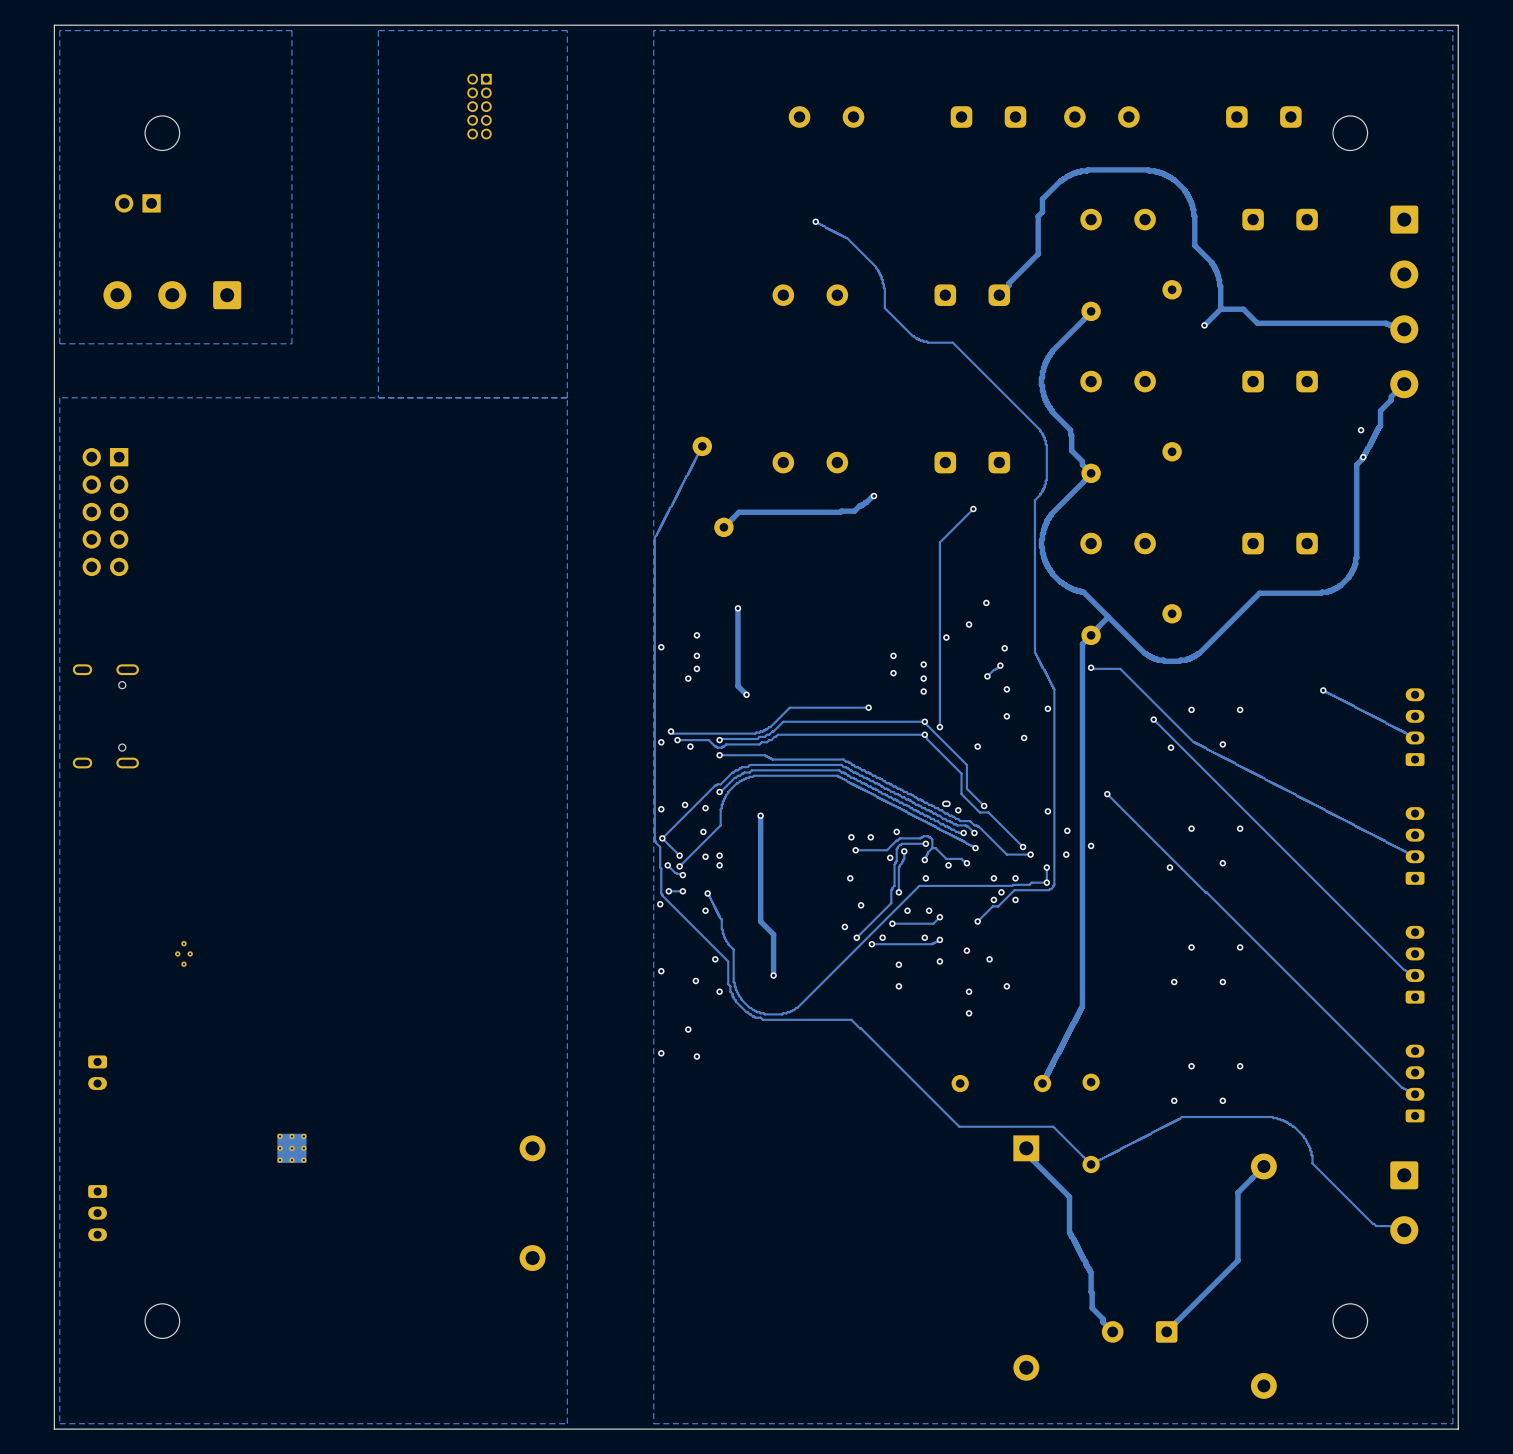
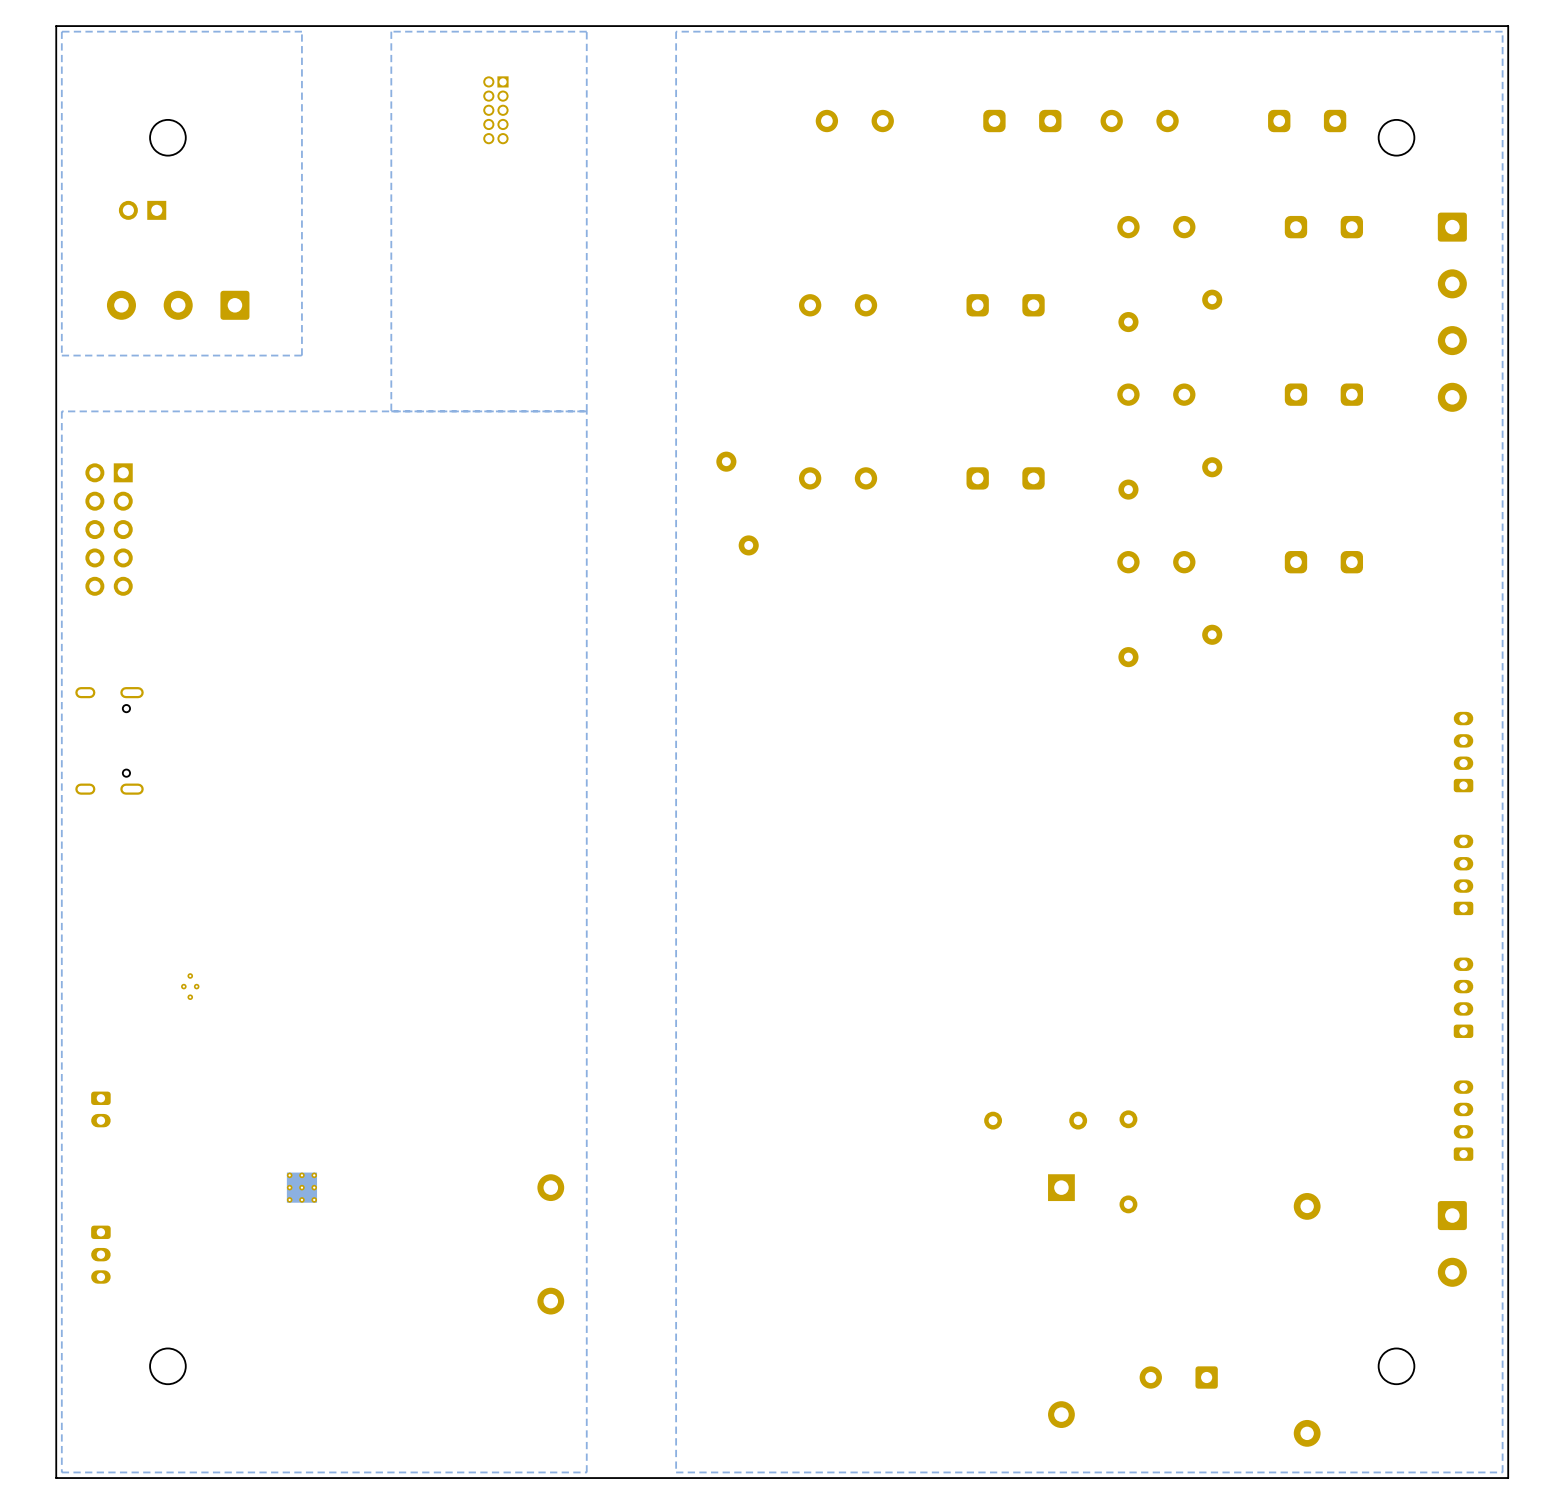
track: (815, 221) (847, 237) (876, 267) (884, 288) (884, 308) (912, 336) (928, 342) (952, 342) (1040, 430) (1046, 445) (1046, 479) (1042, 491) (1034, 500) (1034, 652) (1054, 689) (1054, 884) (1048, 890) (1014, 890) (998, 906) (992, 906) (977, 921) -> none
via: (815, 221) -> none
track: (999, 295) (1038, 254) (1038, 216) (1042, 212) (1042, 199) (1060, 180) (1073, 173) (1087, 169) (1148, 169) (1171, 177) (1187, 193) (1194, 216) (1194, 245) (1212, 262) (1218, 275) (1220, 309) -> none
track: (1220, 309) (1204, 325) -> none
track: (1220, 309) (1243, 309) (1257, 323) (1385, 323) (1404, 329) -> none
track: (1091, 311) (1052, 351) (1042, 371) (1041, 384) (1044, 398) (1052, 411) (1070, 430) (1071, 450) (1091, 473) (1046, 520) (1041, 540) (1042, 553) (1047, 567) (1060, 582) (1073, 590) (1083, 592) (1145, 653) (1158, 660) (1179, 661) (1195, 655) (1259, 593) (1327, 592) (1340, 585) (1349, 577) (1354, 567) (1356, 557) (1356, 464) (1364, 456) (1380, 425) (1380, 410) (1404, 384) -> none
via: (1204, 325) -> none
via: (1361, 430) -> none
track: (702, 446) (654, 537) (654, 840) (660, 847) (662, 895) (728, 961) (728, 984) (735, 1001) (746, 1012) (762, 1019) (851, 1019) (959, 1126) (1053, 1126) (1091, 1164) (1181, 1117) (1272, 1117) (1283, 1120) (1294, 1126) (1303, 1136) (1311, 1151) (1312, 1163) (1372, 1223) (1404, 1230) -> none
via: (1363, 457) -> none
track: (874, 496) (854, 511) (739, 512) (723, 527) -> none
via: (874, 496) -> none
track: (973, 509) (939, 542) (939, 727) -> none
via: (973, 509) -> none
via: (986, 602) -> none
track: (737, 608) (737, 686) (746, 694) -> none
via: (737, 608) -> none
track: (1108, 617) (1082, 644) (1082, 1006) (1042, 1083) -> none
via: (969, 624) -> none
via: (696, 635) -> none
via: (946, 637) -> none
via: (661, 647) -> none
via: (1004, 648) -> none
via: (696, 655) -> none
via: (893, 655) -> none
via: (923, 664) -> none
track: (1000, 665) (987, 676) -> none
via: (1000, 665) -> none
track: (1091, 667) (1120, 668) (1193, 742) (1415, 856) -> none
via: (1091, 667) -> none
via: (696, 668) -> none
via: (893, 673) -> none
via: (987, 676) -> none
via: (688, 678) -> none
via: (923, 678) -> none
via: (1006, 689) -> none
track: (1323, 690) (1415, 737) -> none
via: (1323, 690) -> none
via: (923, 691) -> none
via: (746, 694) -> none
track: (868, 707) (789, 707) (770, 727) (755, 733) (673, 733) (671, 731) -> none
via: (868, 707) -> none
via: (1047, 708) -> none
via: (1191, 709) -> none
via: (1240, 709) -> none
via: (1006, 716) -> none
track: (1153, 719) (1404, 970) (1415, 975) -> none
via: (1153, 719) -> none
via: (924, 721) -> none
via: (939, 727) -> none
via: (671, 731) -> none
via: (924, 734) -> none
via: (1024, 737) -> none
track: (677, 740) (708, 740) (715, 746) (721, 747) (726, 744) (759, 744) (771, 740) (777, 734) (924, 734) (961, 773) (961, 794) (979, 812) (988, 812) (1023, 847) -> none
via: (677, 740) -> none
track: (719, 740) (757, 739) (764, 736) (783, 721) (924, 721) (966, 764) (966, 788) (984, 805) -> none
via: (719, 740) -> none
via: (661, 742) -> none
via: (1222, 744) -> none
via: (690, 746) -> none
via: (977, 746) -> none
via: (1171, 747) -> none
track: (719, 755) (764, 755) (772, 759) (843, 759) (960, 821) (970, 821) (978, 826) (1006, 854) (1030, 854) -> none
via: (719, 755) -> none
track: (719, 791) (737, 775) (752, 770) (839, 770) (940, 824) (956, 831) (963, 832) -> none
via: (719, 791) -> none
track: (1107, 794) (1402, 1087) (1415, 1094) -> none
via: (1107, 794) -> none
via: (945, 803) -> none
via: (947, 803) -> none
via: (685, 804) -> none
via: (984, 805) -> none
via: (705, 808) -> none
via: (661, 809) -> none
via: (958, 810) -> none
via: (1047, 811) -> none
track: (760, 815) (760, 921) (773, 934) (773, 975) -> none
via: (760, 815) -> none
via: (1191, 828) -> none
via: (1240, 828) -> none
via: (1067, 830) -> none
via: (703, 831) -> none
via: (896, 831) -> none
via: (963, 832) -> none
track: (974, 832) (967, 826) (953, 824) (841, 764) (749, 764) (735, 770) (720, 784) (715, 785) (662, 838) (679, 855) -> none
via: (974, 832) -> none
via: (851, 837) -> none
via: (870, 837) -> none
via: (662, 838) -> none
track: (925, 843) (902, 843) (897, 847) (891, 903) (856, 937) -> none
via: (925, 843) -> none
via: (1091, 845) -> none
via: (1023, 847) -> none
track: (932, 848) (924, 859) -> none
track: (932, 848) (932, 839) (928, 836) (923, 836) (920, 838) (899, 838) (886, 850) (855, 850) -> none
track: (932, 848) (935, 848) (946, 858) (961, 858) (966, 863) -> none
track: (975, 848) (837, 775) (754, 775) (740, 781) (728, 791) (720, 809) (720, 825) (679, 866) -> none
via: (975, 848) -> none
via: (855, 850) -> none
track: (904, 851) (904, 858) (898, 867) (898, 892) -> none
via: (904, 851) -> none
via: (1030, 854) -> none
via: (1066, 854) -> none
via: (679, 855) -> none
via: (719, 855) -> none
via: (705, 856) -> none
via: (890, 857) -> none
via: (924, 859) -> none
via: (966, 863) -> none
via: (1222, 863) -> none
track: (667, 865) (675, 872) (682, 875) -> none
via: (667, 865) -> none
via: (719, 865) -> none
via: (948, 865) -> none
via: (679, 866) -> none
track: (1046, 867) (1046, 882) (1012, 885) (919, 885) (797, 1007) (782, 1014) (757, 1012) (749, 1007) (739, 996) (733, 982) (733, 949) (723, 936) (721, 919) (707, 893) -> none
via: (1046, 867) -> none
via: (1169, 867) -> none
via: (682, 875) -> none
via: (850, 878) -> none
via: (925, 878) -> none
via: (993, 878) -> none
via: (1015, 878) -> none
via: (1046, 882) -> none
via: (668, 891) -> none
track: (682, 891) (668, 891) -> none
via: (682, 891) -> none
via: (898, 892) -> none
via: (1001, 892) -> none
via: (707, 893) -> none
via: (993, 899) -> none
via: (1015, 899) -> none
via: (660, 904) -> none
via: (861, 905) -> none
via: (705, 910) -> none
via: (907, 910) -> none
via: (929, 910) -> none
track: (939, 917) (933, 923) (892, 923) -> none
via: (939, 917) -> none
via: (977, 921) -> none
via: (892, 923) -> none
via: (844, 926) -> none
via: (856, 937) -> none
via: (882, 937) -> none
via: (924, 937) -> none
track: (939, 939) (932, 944) (871, 944) -> none
via: (939, 939) -> none
via: (871, 944) -> none
via: (1191, 947) -> none
via: (1240, 947) -> none
via: (966, 950) -> none
via: (715, 959) -> none
via: (989, 959) -> none
via: (939, 961) -> none
via: (898, 964) -> none
via: (661, 971) -> none
via: (773, 975) -> none
via: (695, 980) -> none
via: (1174, 982) -> none
via: (1222, 982) -> none
via: (898, 986) -> none
via: (1006, 986) -> none
via: (719, 991) -> none
via: (969, 991) -> none
via: (969, 1013) -> none
via: (688, 1029) -> none
via: (661, 1053) -> none
via: (696, 1056) -> none
via: (1191, 1066) -> none
via: (1240, 1066) -> none
via: (1174, 1100) -> none
via: (1222, 1100) -> none
track: (1026, 1148) (1032, 1160) (1069, 1196) (1069, 1232) (1091, 1272) (1092, 1308) (1112, 1331) -> none
track: (1263, 1166) (1237, 1192) (1237, 1260) (1166, 1331) -> none

